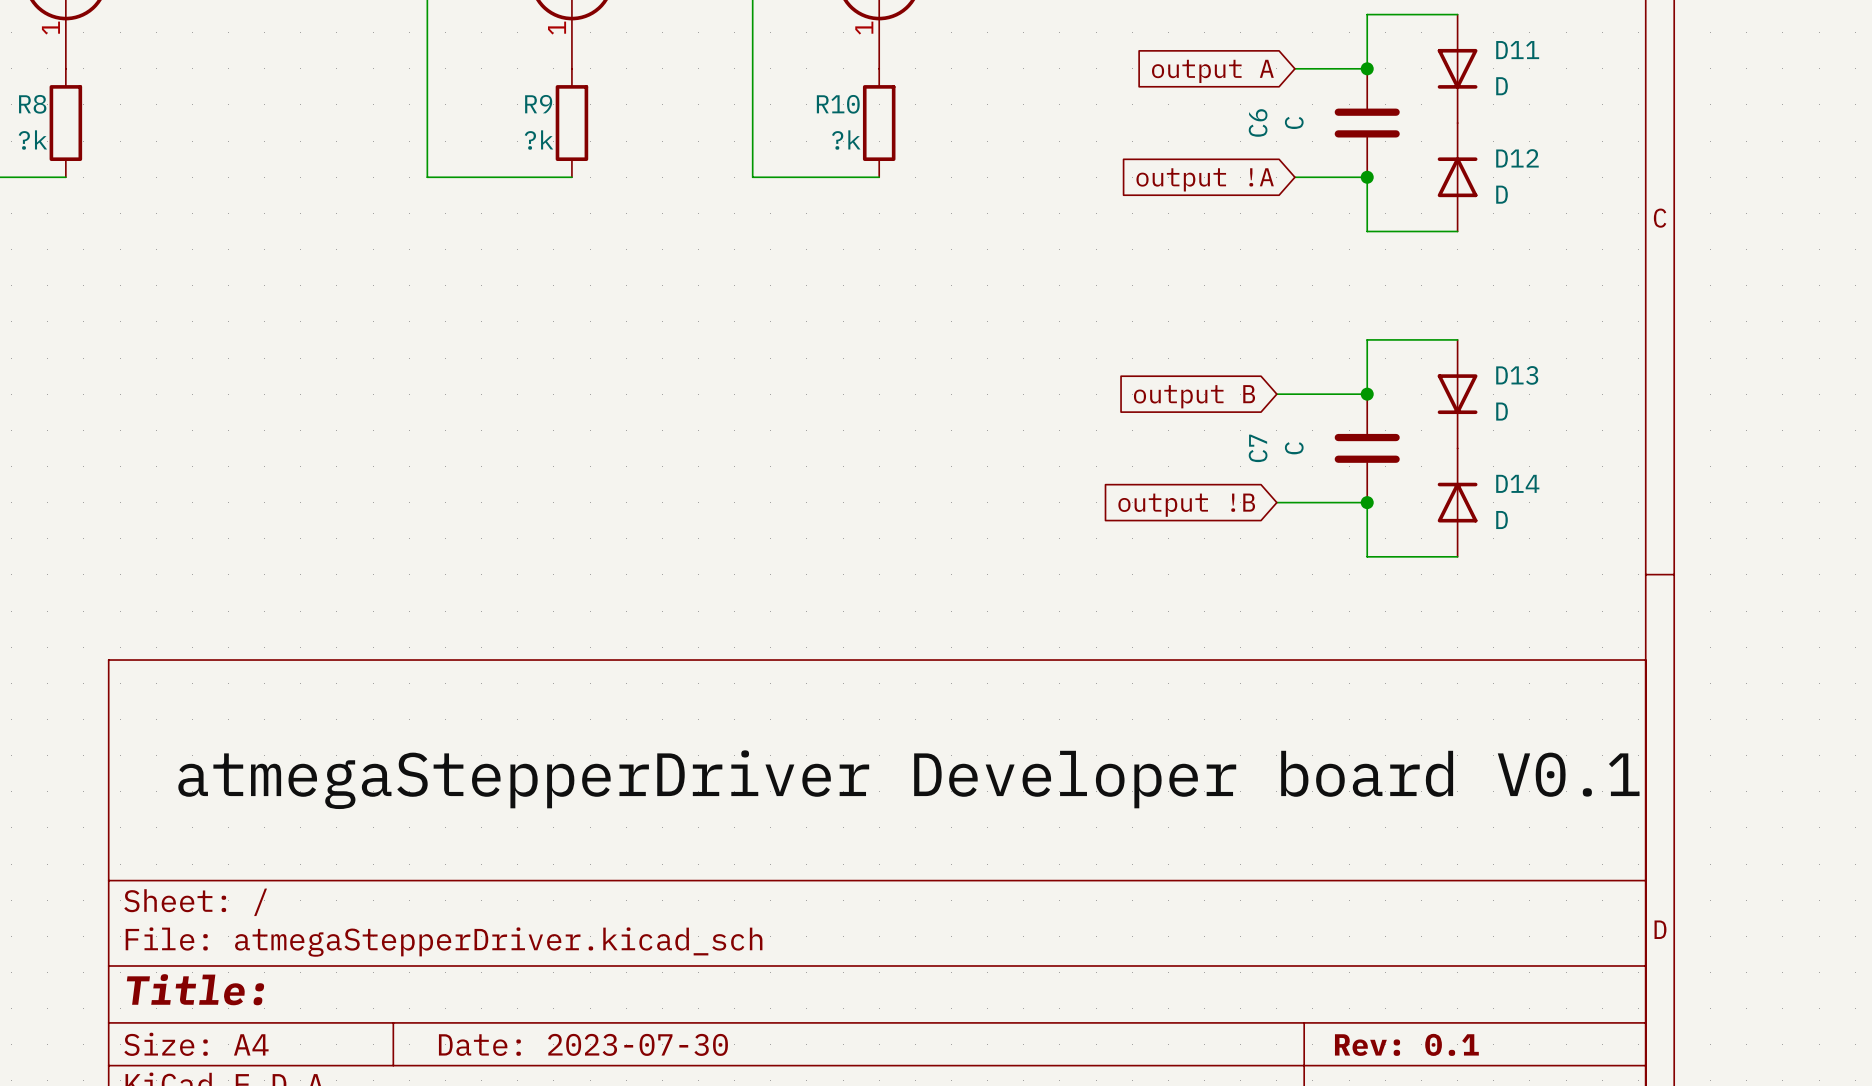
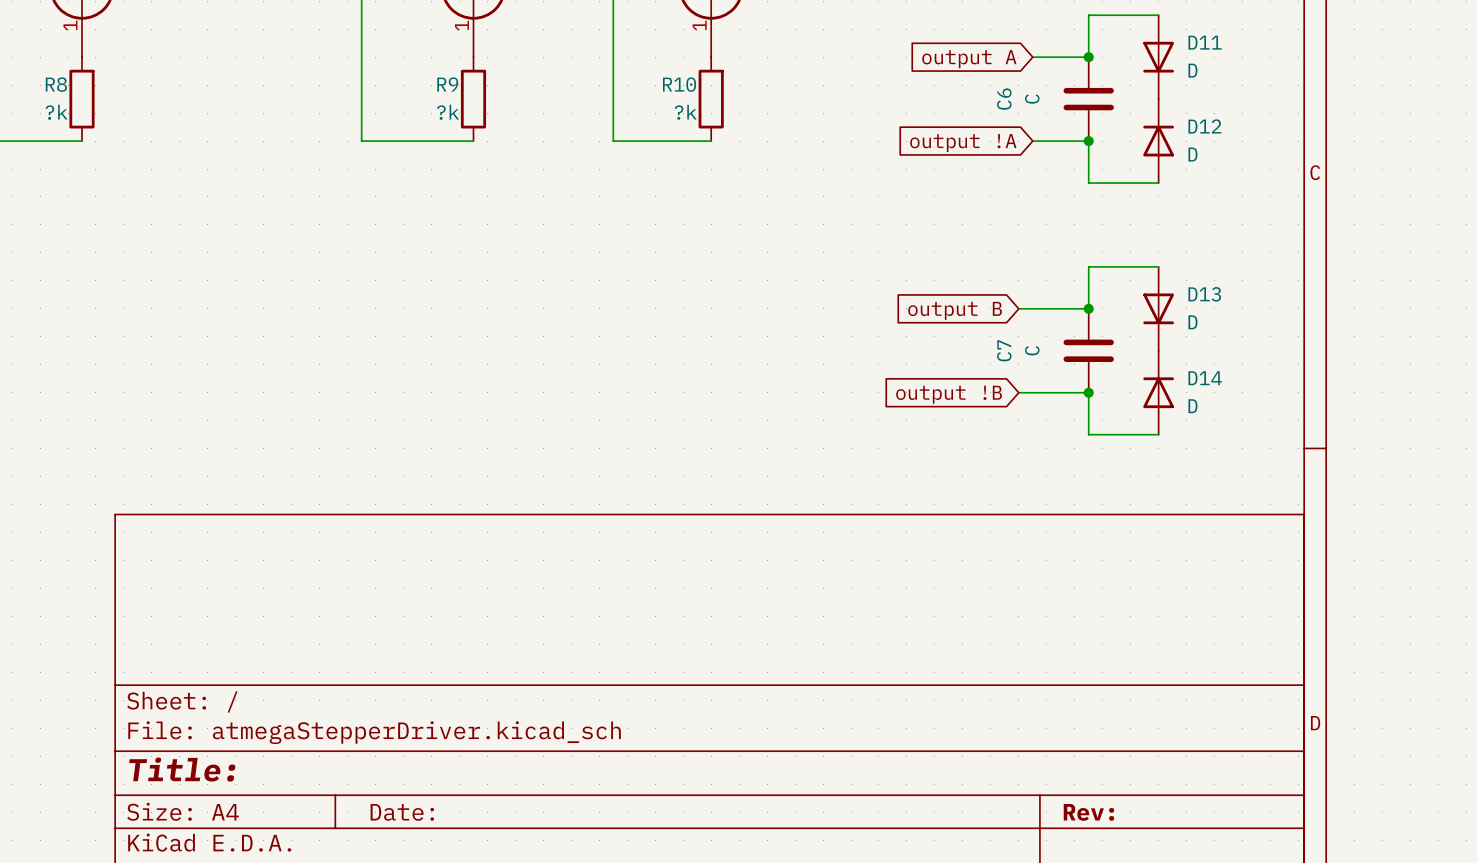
label: atmegaStepperDriver Developer board V0.1 (908, 779) -> none
title block: Date: 2023-07-30 (583, 1044) -> Date: (402, 812)
title block: Rev: 0.1 (1406, 1044) -> Rev: (1088, 812)

